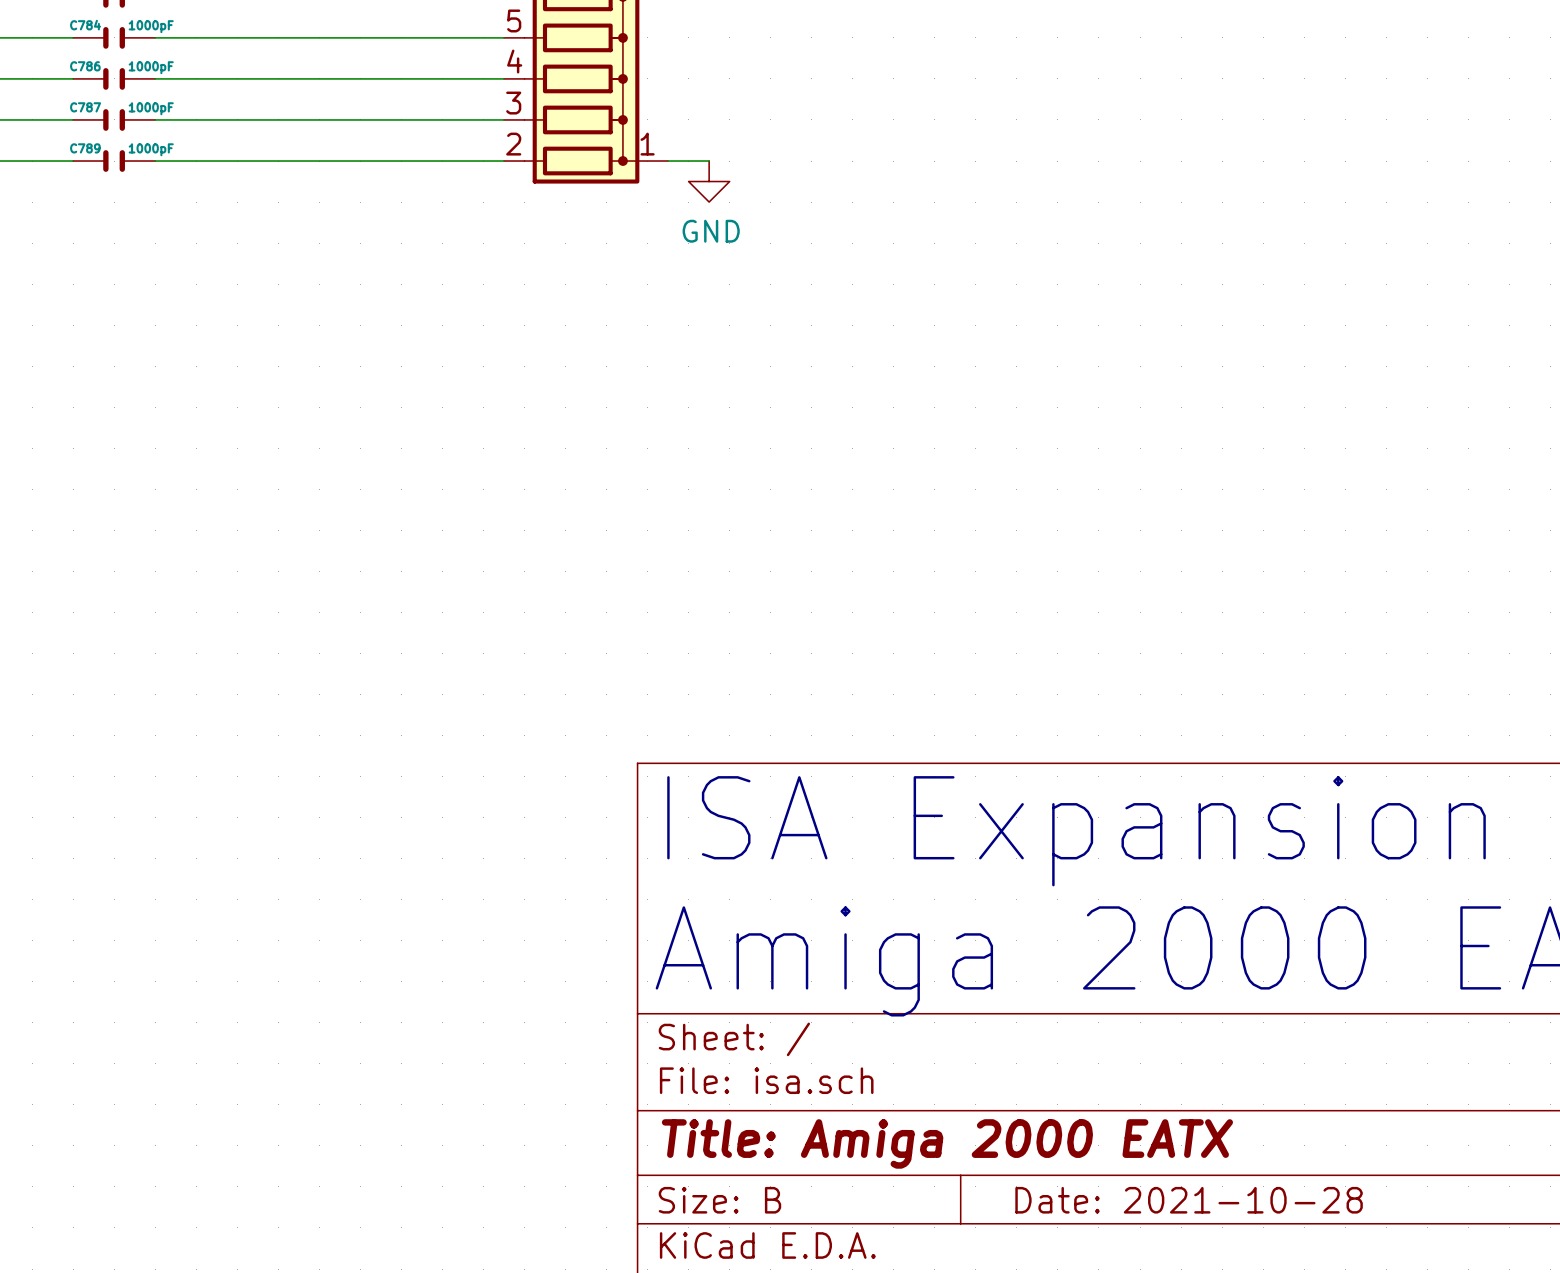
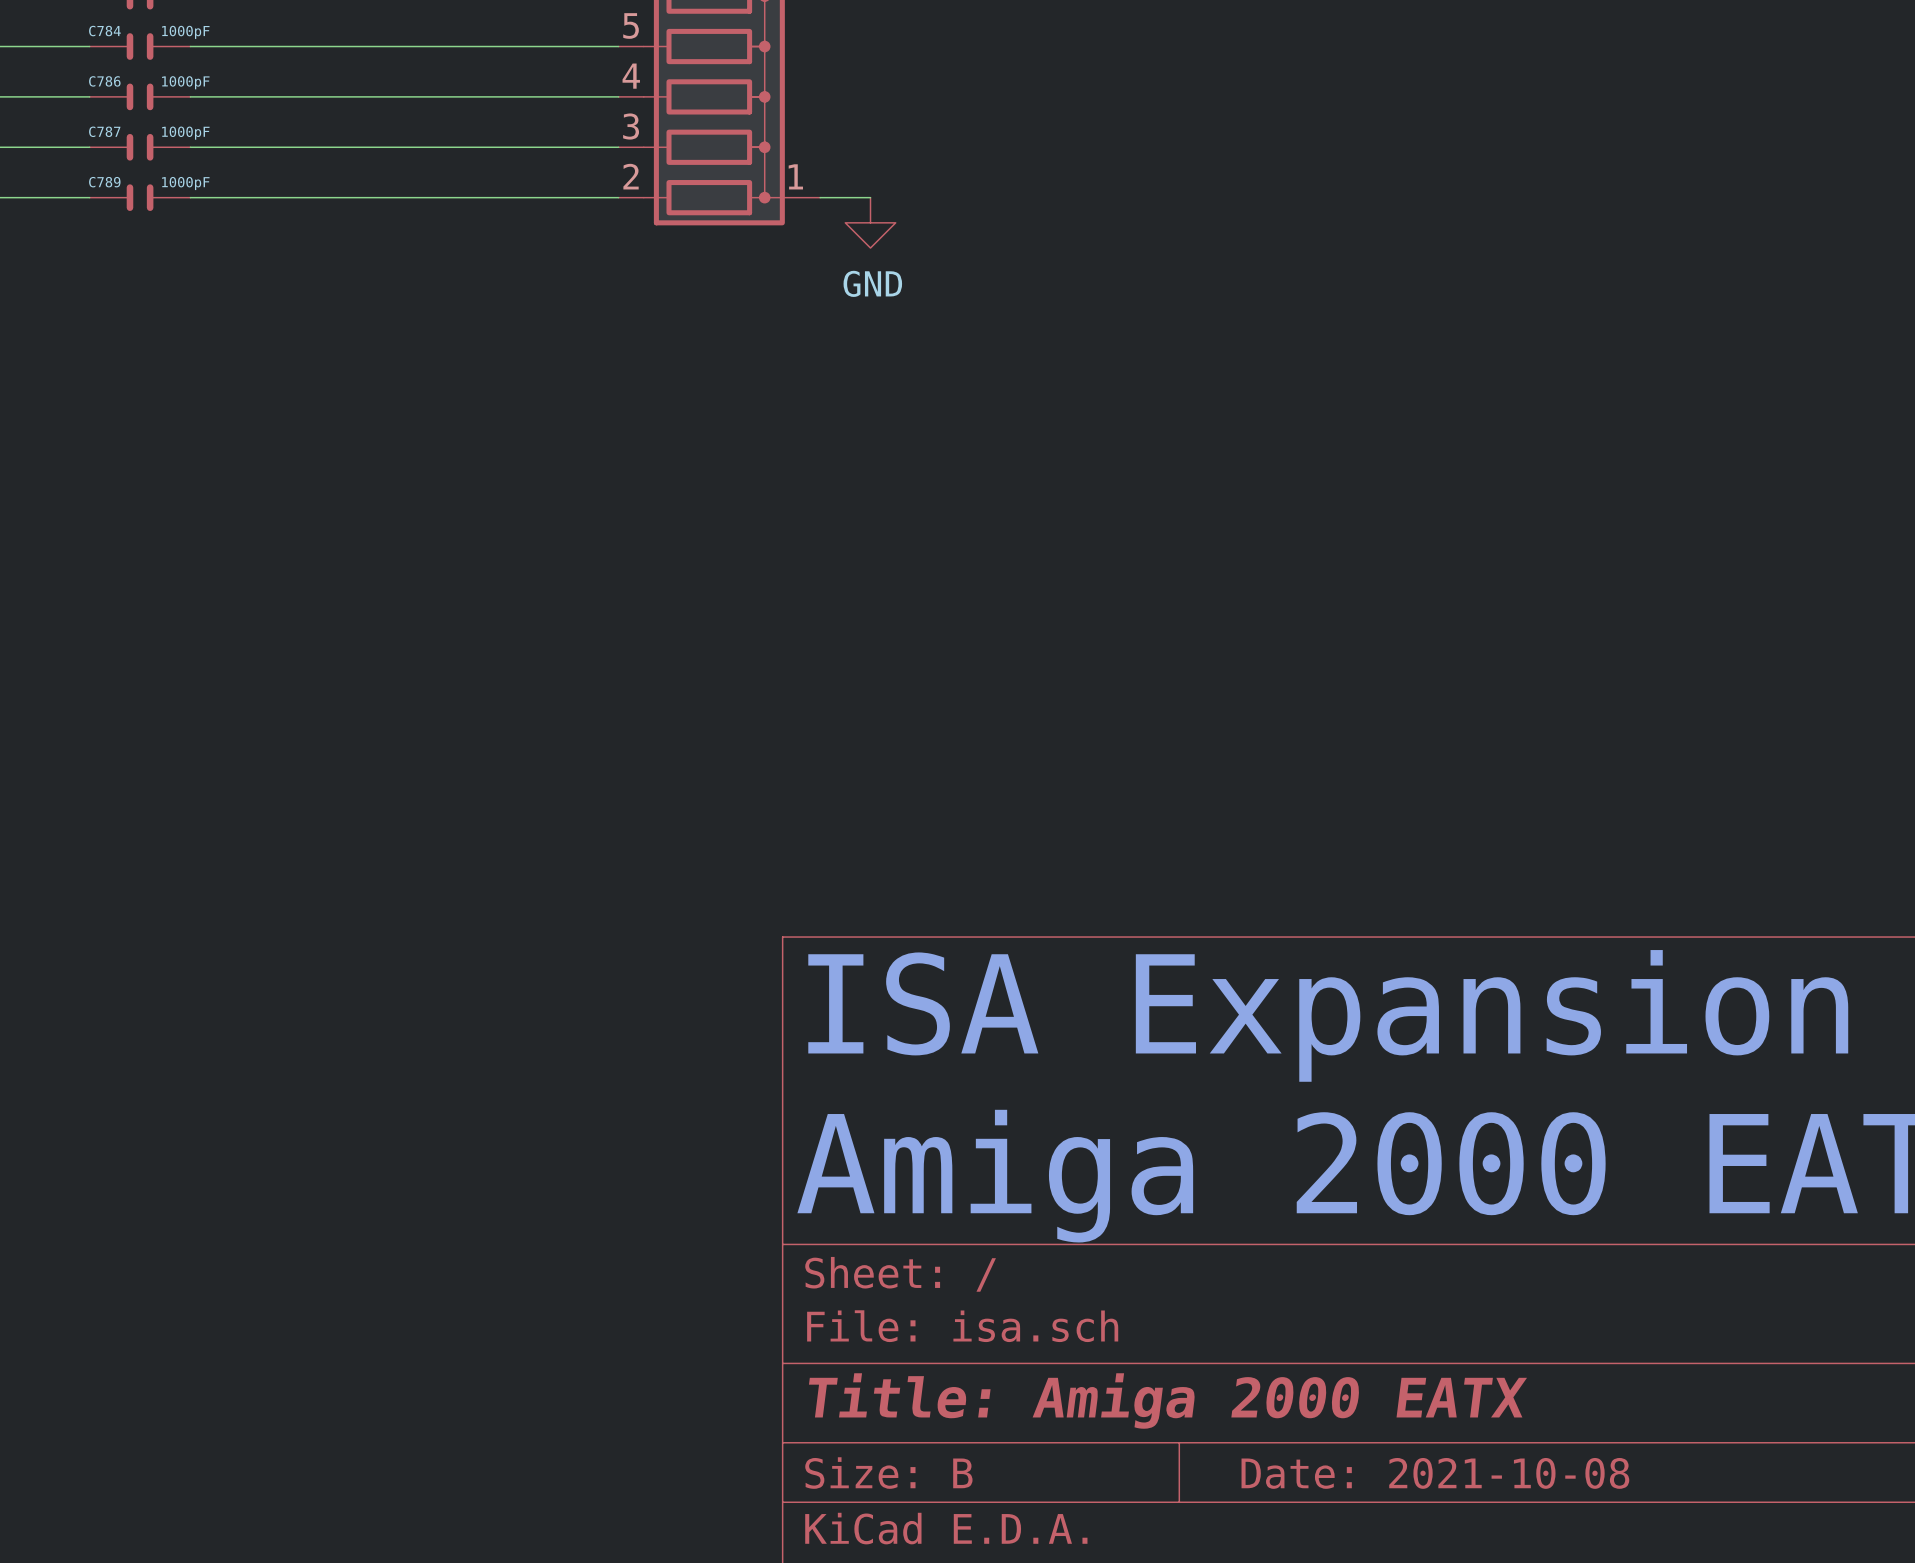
title block: Date: 2021-10-28 (1189, 1200) -> Date: 2021-10-08 (1435, 1473)

